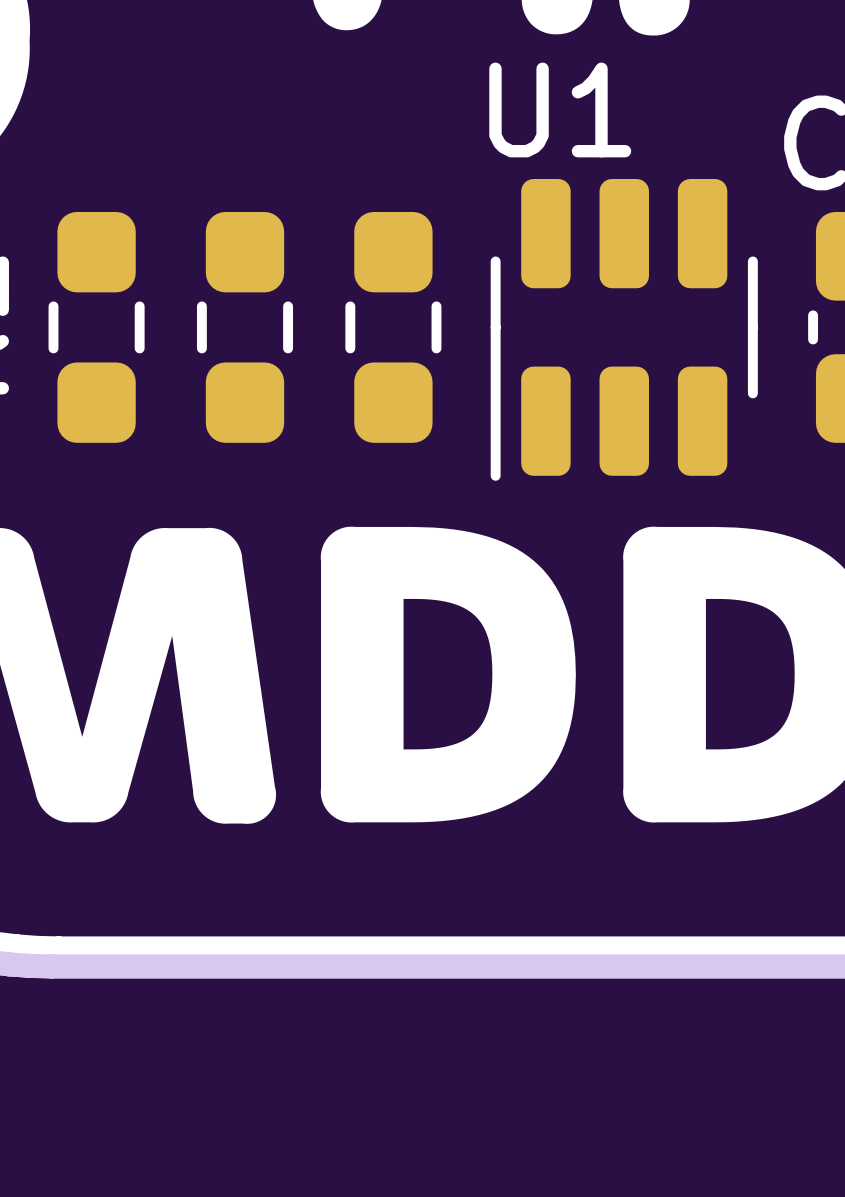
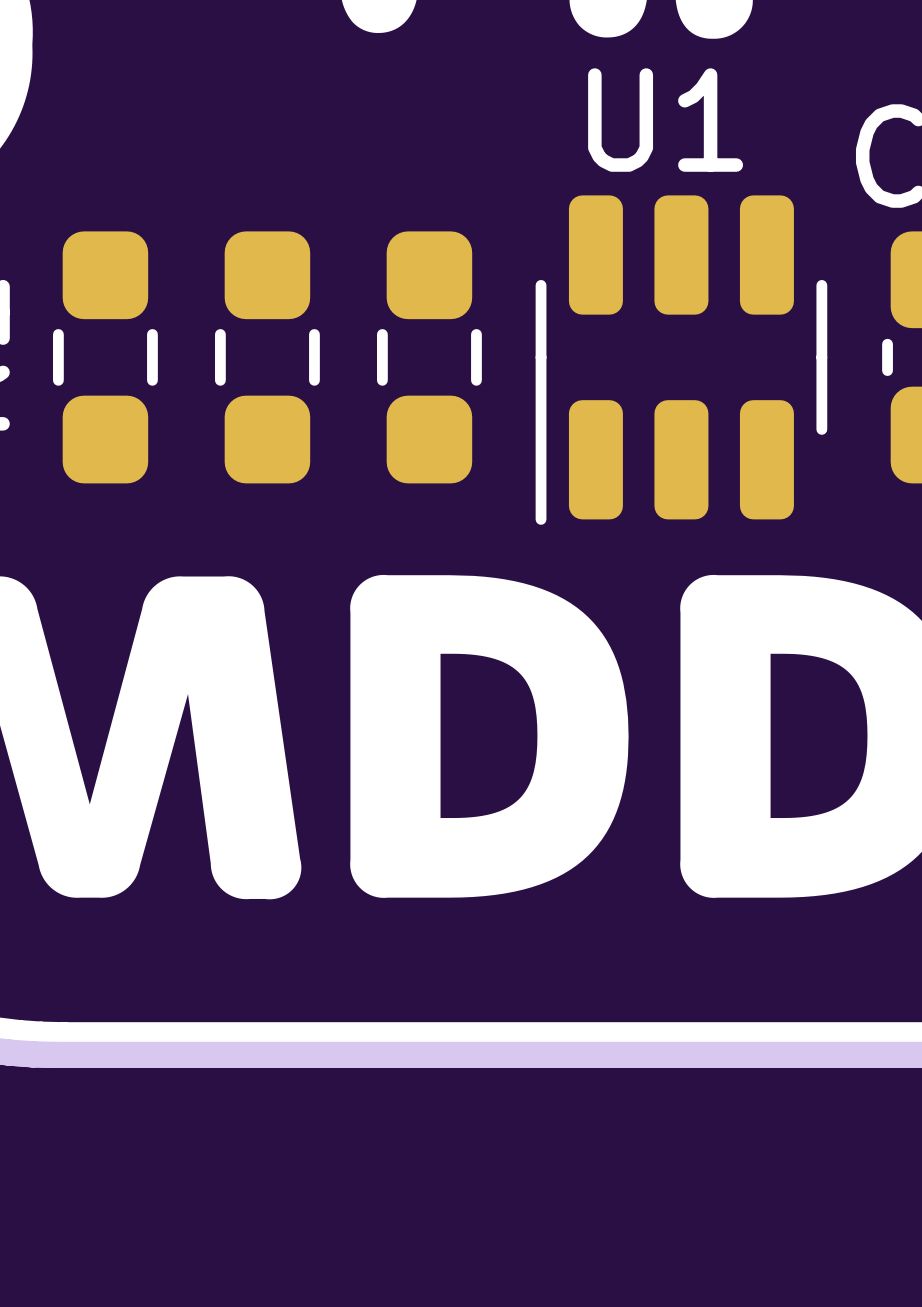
U1 name position: U1 (560, 109) -> U1 (665, 120)

